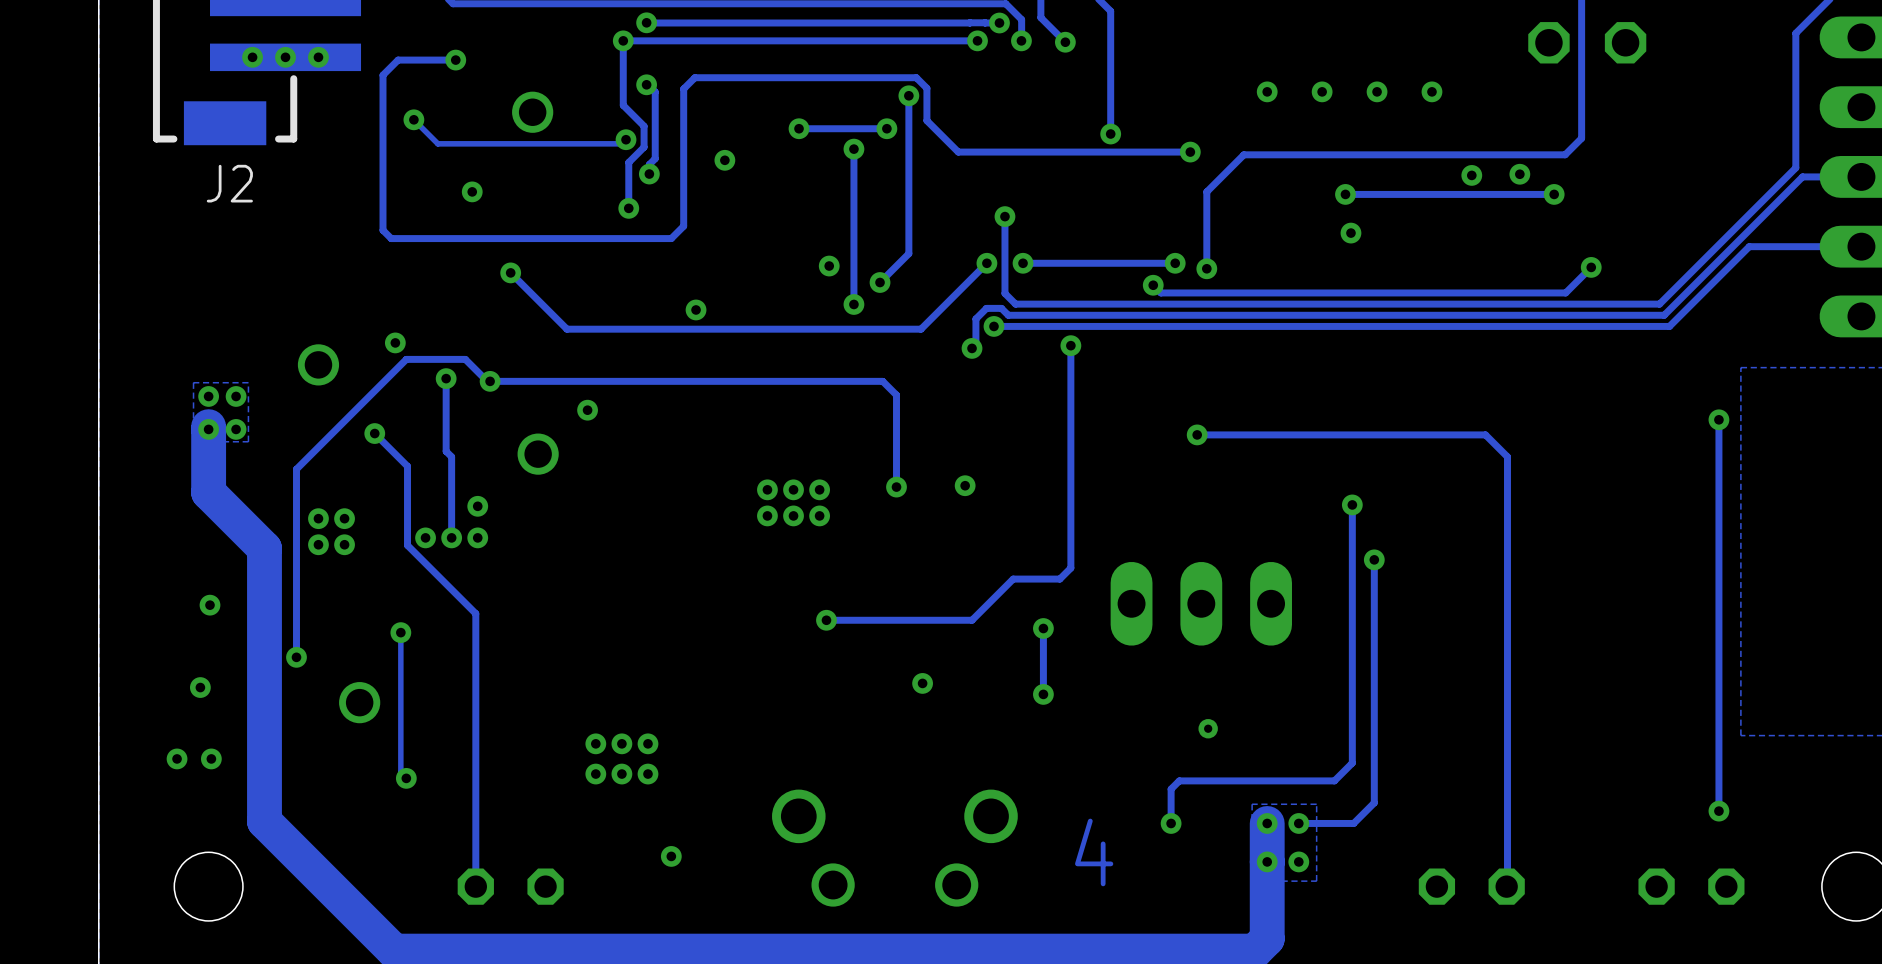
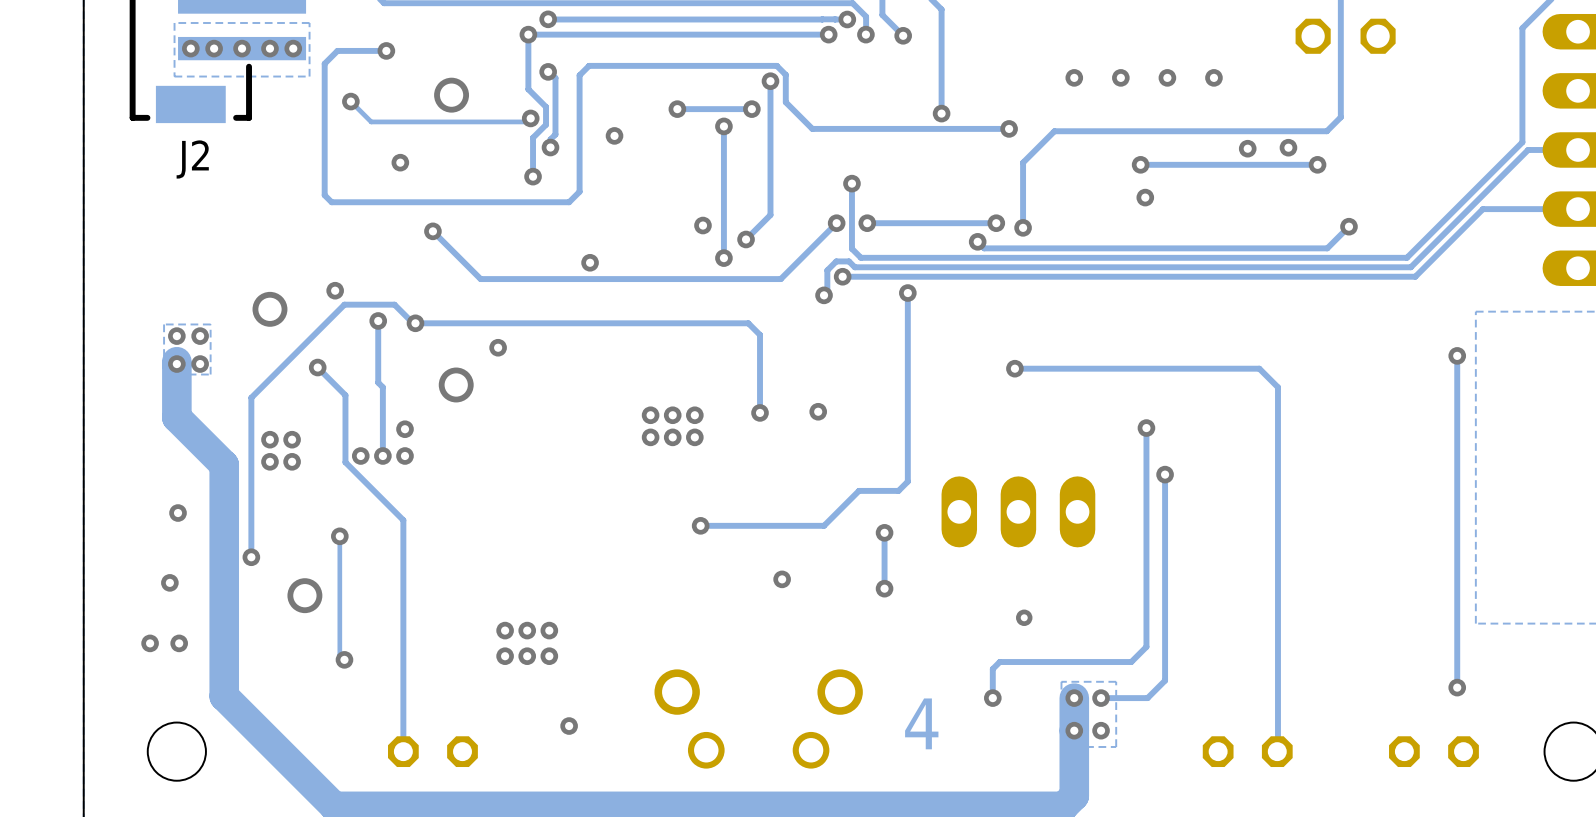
zone outline: none -> (309, 22) (309, 76) (174, 76) (174, 22) (309, 22)
via: none -> (190, 48)
via: none -> (293, 48)

